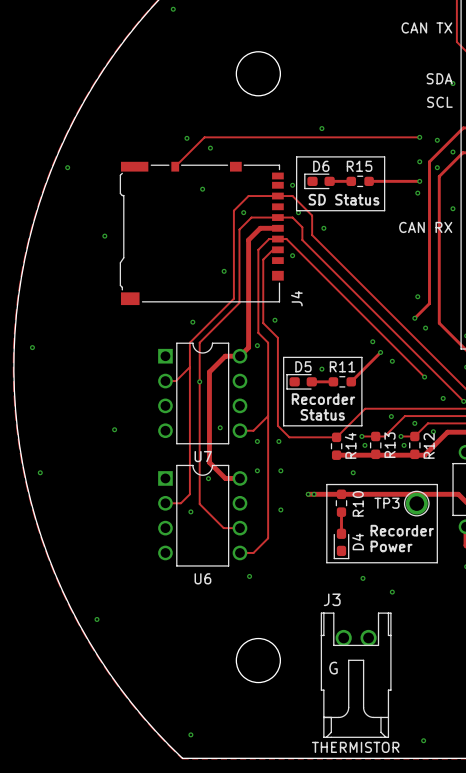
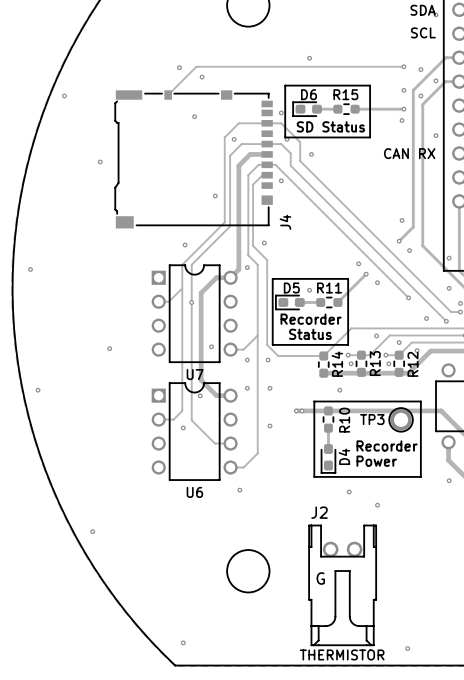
J3 name: J3 (332, 599) -> J2 (319, 512)

